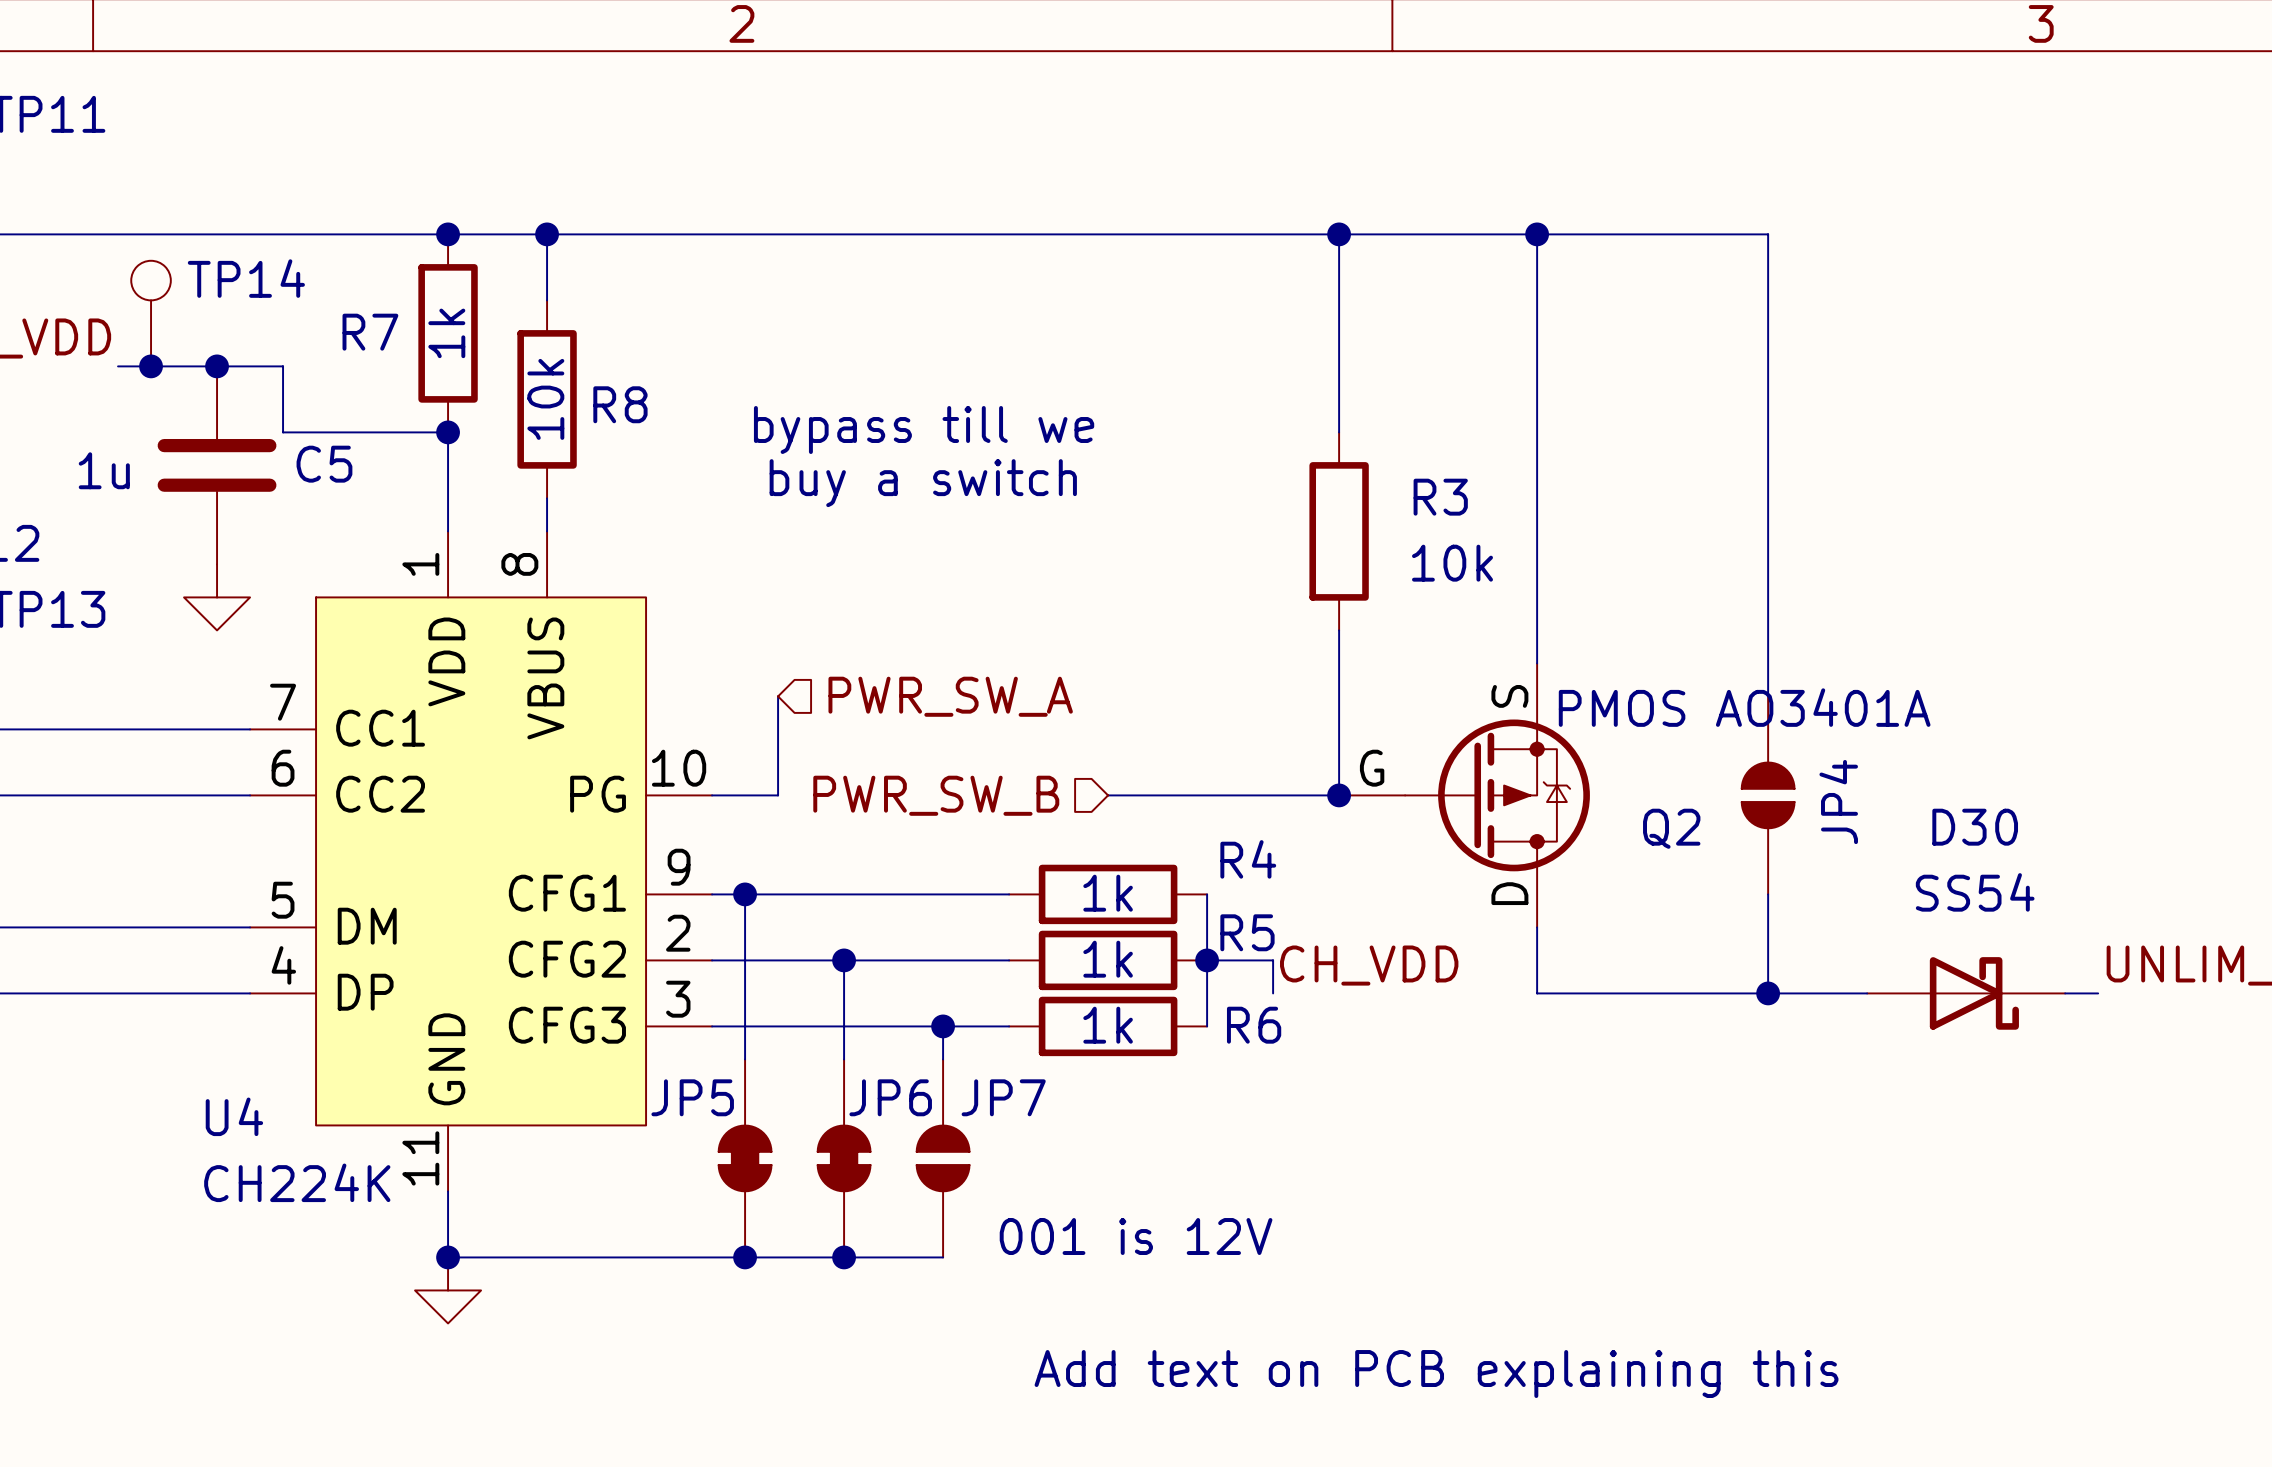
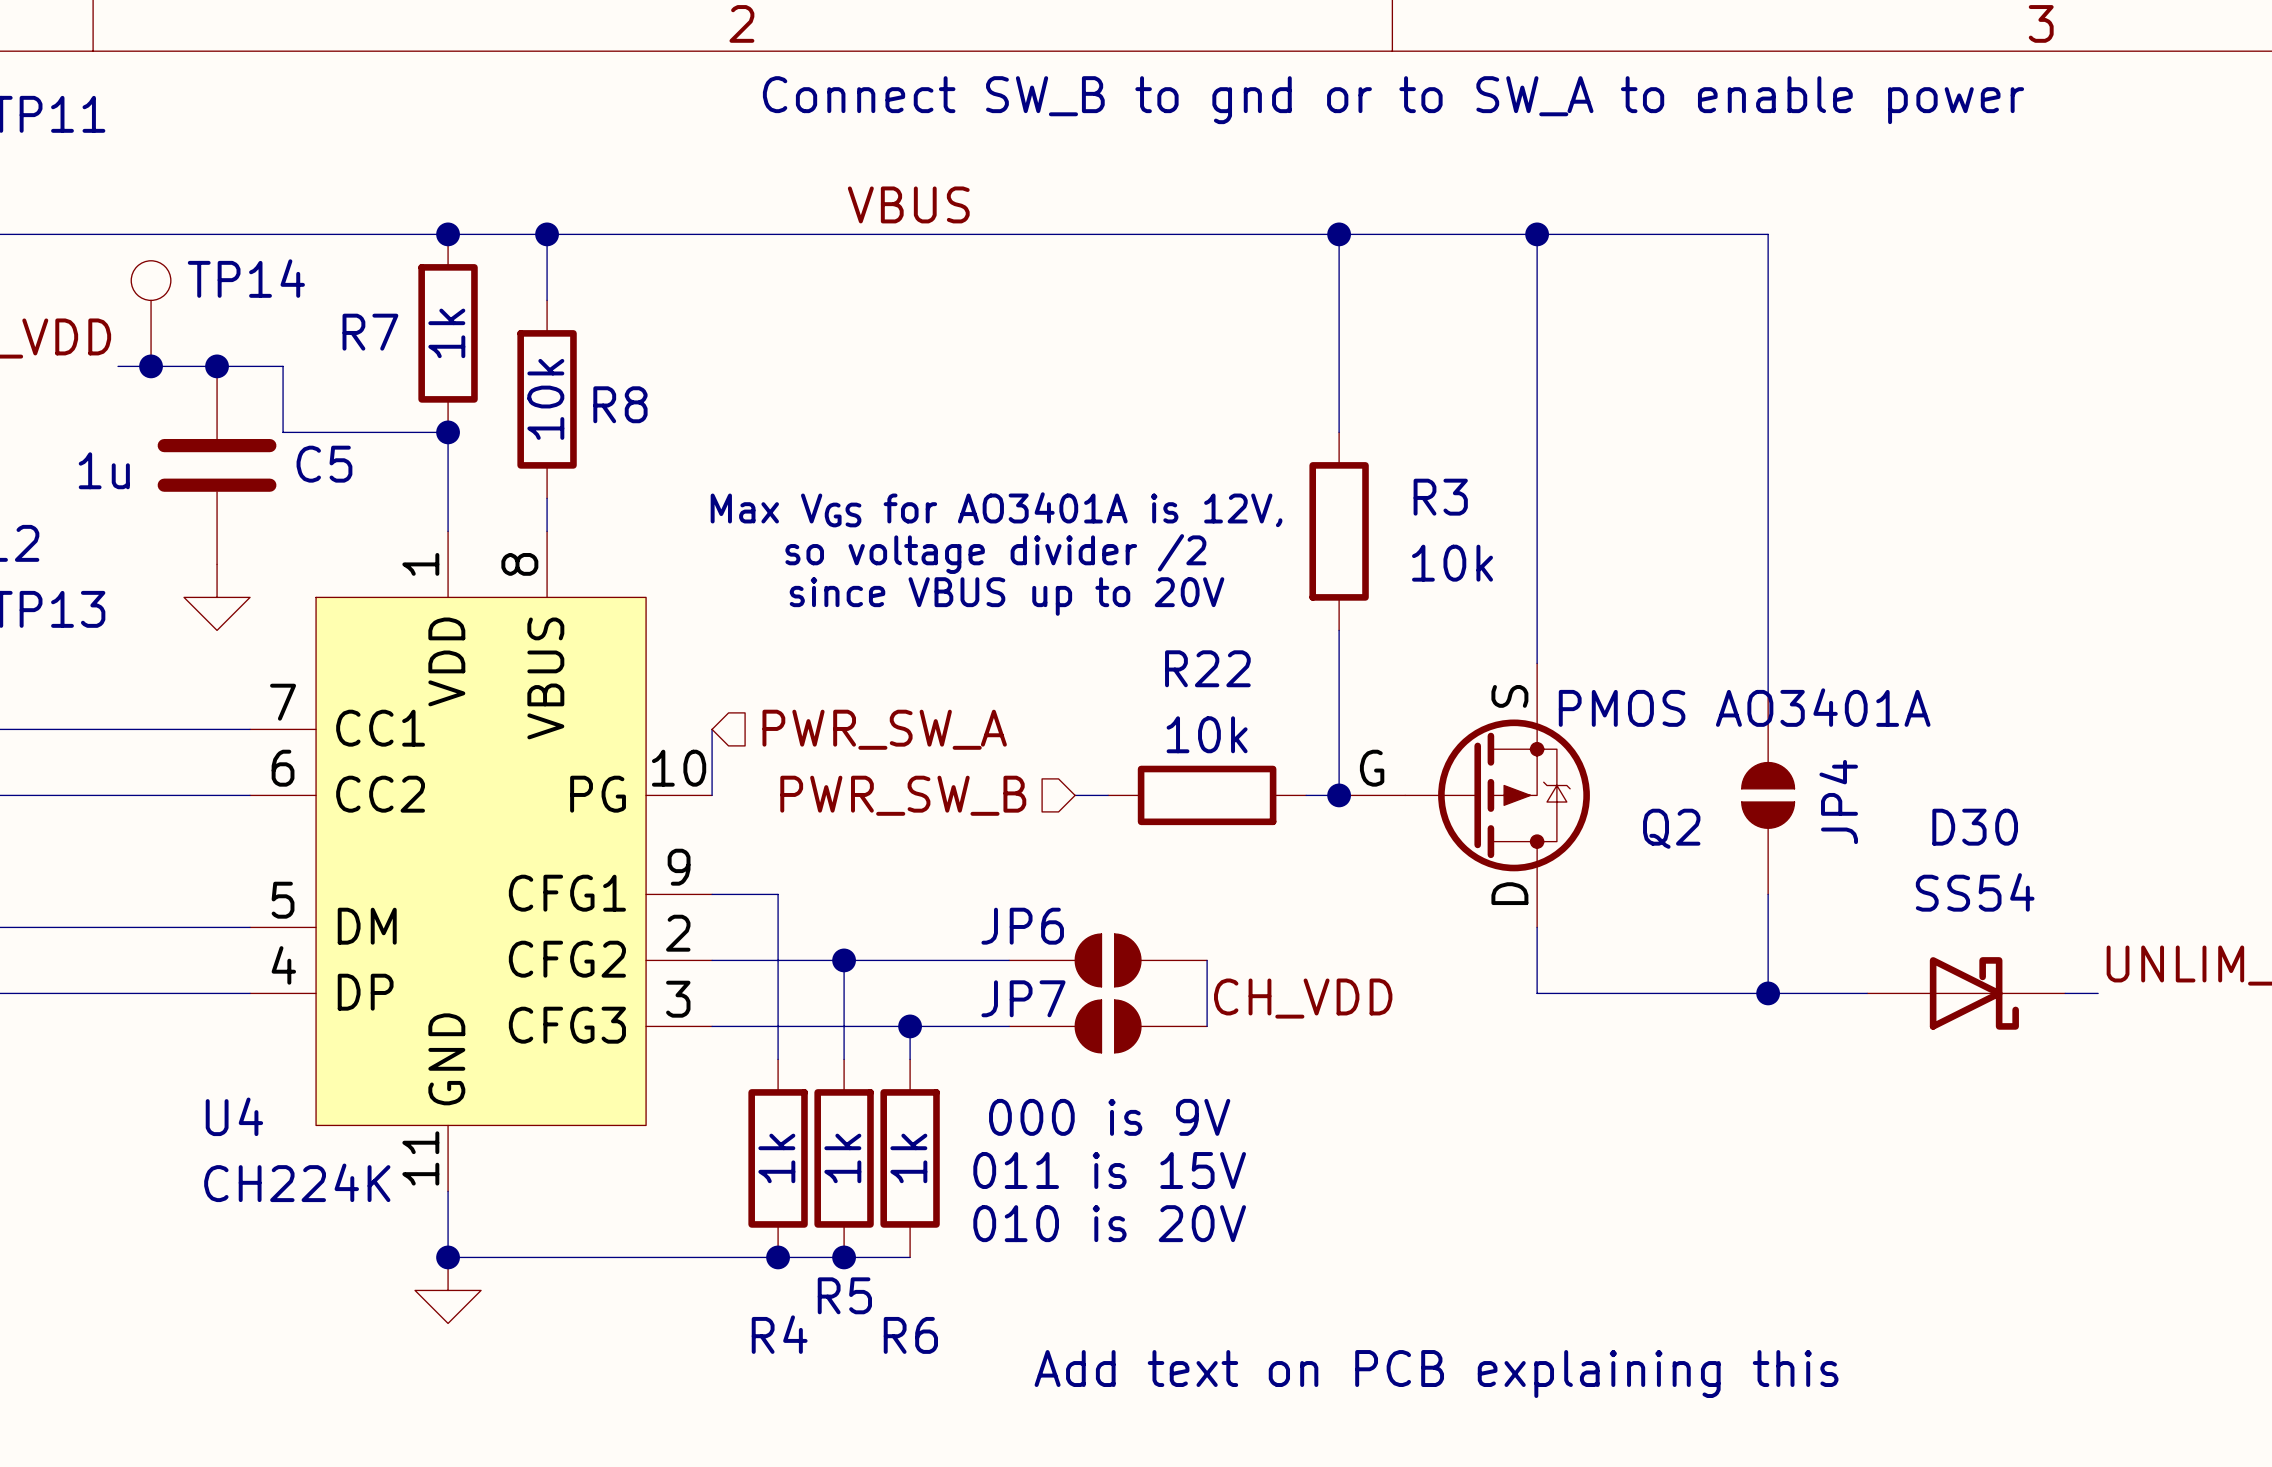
text: none -> Connect SW_B to gnd or to SW_A to enable power (1393, 100)
label: none -> VBUS (908, 204)
text: bypass till we (924, 430) -> none
text: buy a switch (923, 483) -> none
text: none -> Max VGS for AO3401A is 12V, (996, 509)
text: none -> so voltage divider /2 (995, 554)
text: none -> since VBUS up to 20V (1007, 596)
wire: (778, 696) (778, 795) (712, 795) -> (712, 729) (712, 795)
hierarchical label position: PWR_SW_A (950, 696) -> PWR_SW_A (884, 729)
hierarchical label position: PWR_SW_B (936, 795) -> PWR_SW_B (903, 795)
wire: (1108, 795) (1306, 795) -> (1108, 795) (1075, 795)
R22: none -> 10k (1207, 795)
wire: (745, 894) (745, 1059) -> none
junction: (745, 894) -> none
wire: (778, 894) (1009, 894) -> (778, 894) (778, 1059)
R4 rotation: 0° (1108, 894) -> 90° clockwise (778, 1158)
R4 position: (1108, 894) -> (778, 1158)
wire: (1207, 894) (1207, 960) (1273, 960) (1273, 993) -> none
R5 rotation: 0° (1108, 960) -> 90° clockwise (844, 1158)
R5 position: (1108, 960) -> (844, 1158)
junction: (1207, 960) -> none
label position: CH_VDD (1369, 965) -> CH_VDD (1303, 998)
wire: (943, 1026) (943, 1059) -> (910, 1026) (910, 1059)
junction position: (943, 1026) -> (910, 1026)
R6 rotation: 0° (1108, 1026) -> 90° clockwise (910, 1158)
R6 position: (1108, 1026) -> (910, 1158)
JP6 symbol: [817, 1059, 871, 1258] -> [1009, 934, 1208, 987]
JP6 name position: JP6 (890, 1097) -> JP6 (1022, 926)
JP7 name position: JP7 (1003, 1097) -> JP7 (1023, 998)
text: none -> 000 is 9V (1109, 1117)
JP5: (745, 1158) -> none
JP7 rotation: 0° (943, 1158) -> 90° clockwise (1108, 1026)
JP7 position: (943, 1158) -> (1108, 1026)
text: none -> 011 is 15V (1109, 1170)
text: 001 is 12V (1136, 1236) -> 010 is 20V (1109, 1223)
junction position: (745, 1257) -> (778, 1257)
wire: (910, 1257) (943, 1257) -> none

